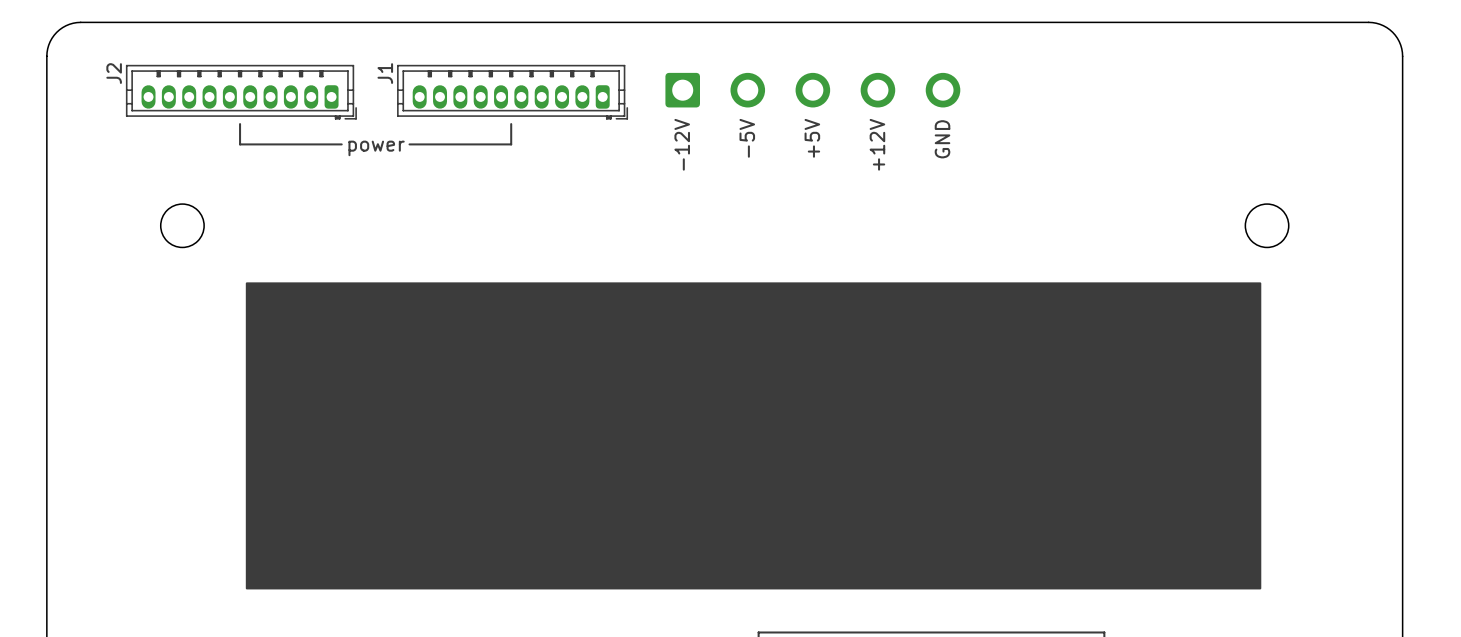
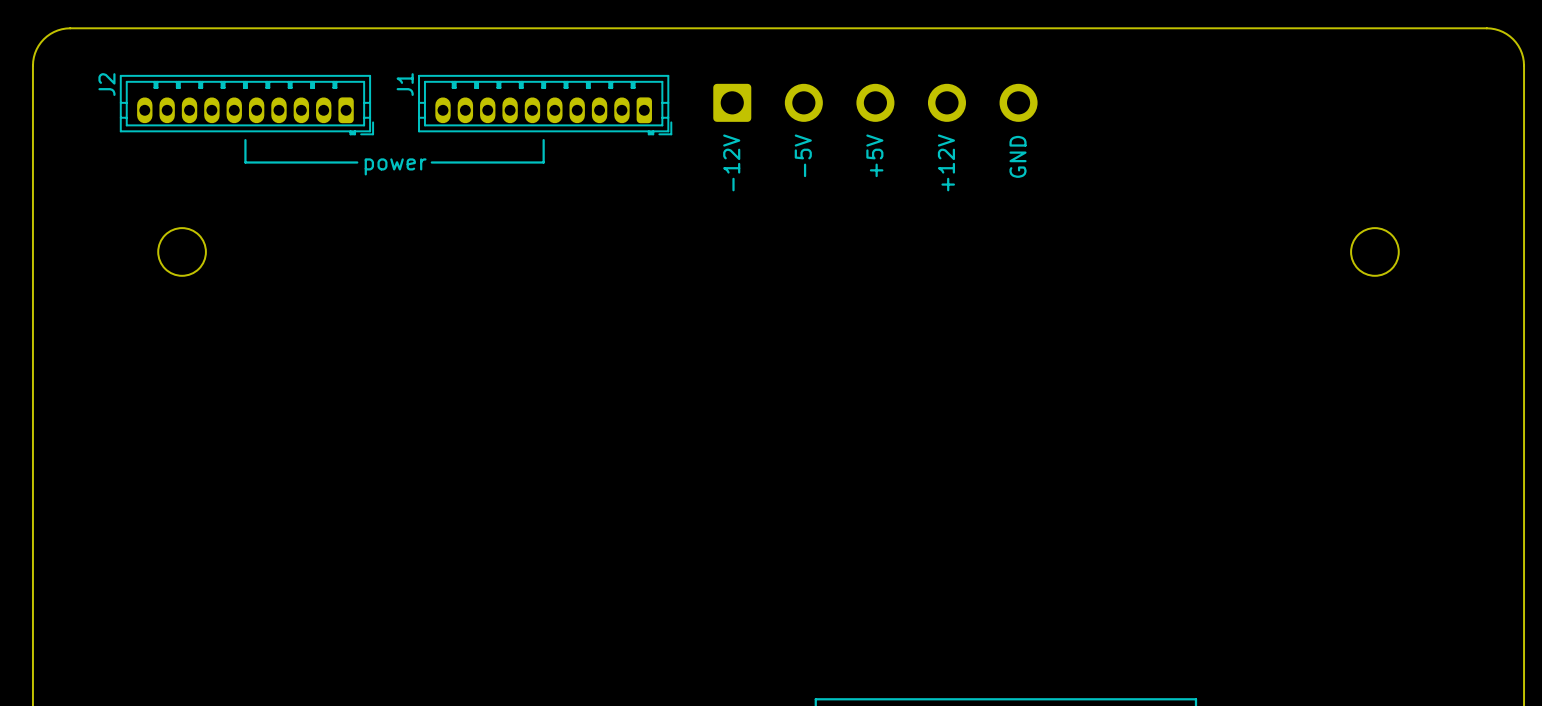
drawing: [245, 282, 1262, 590] -> none

